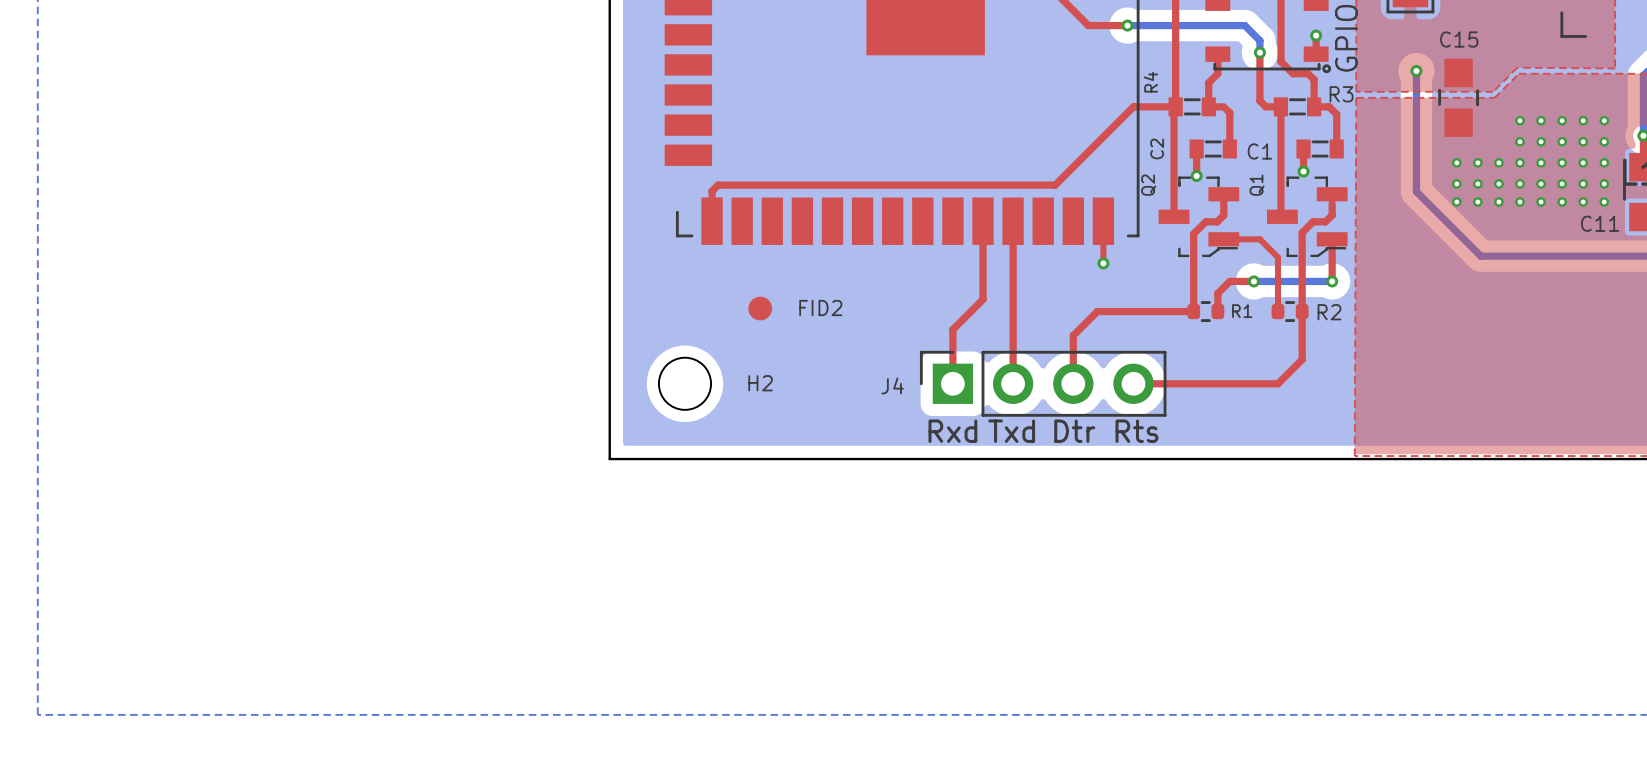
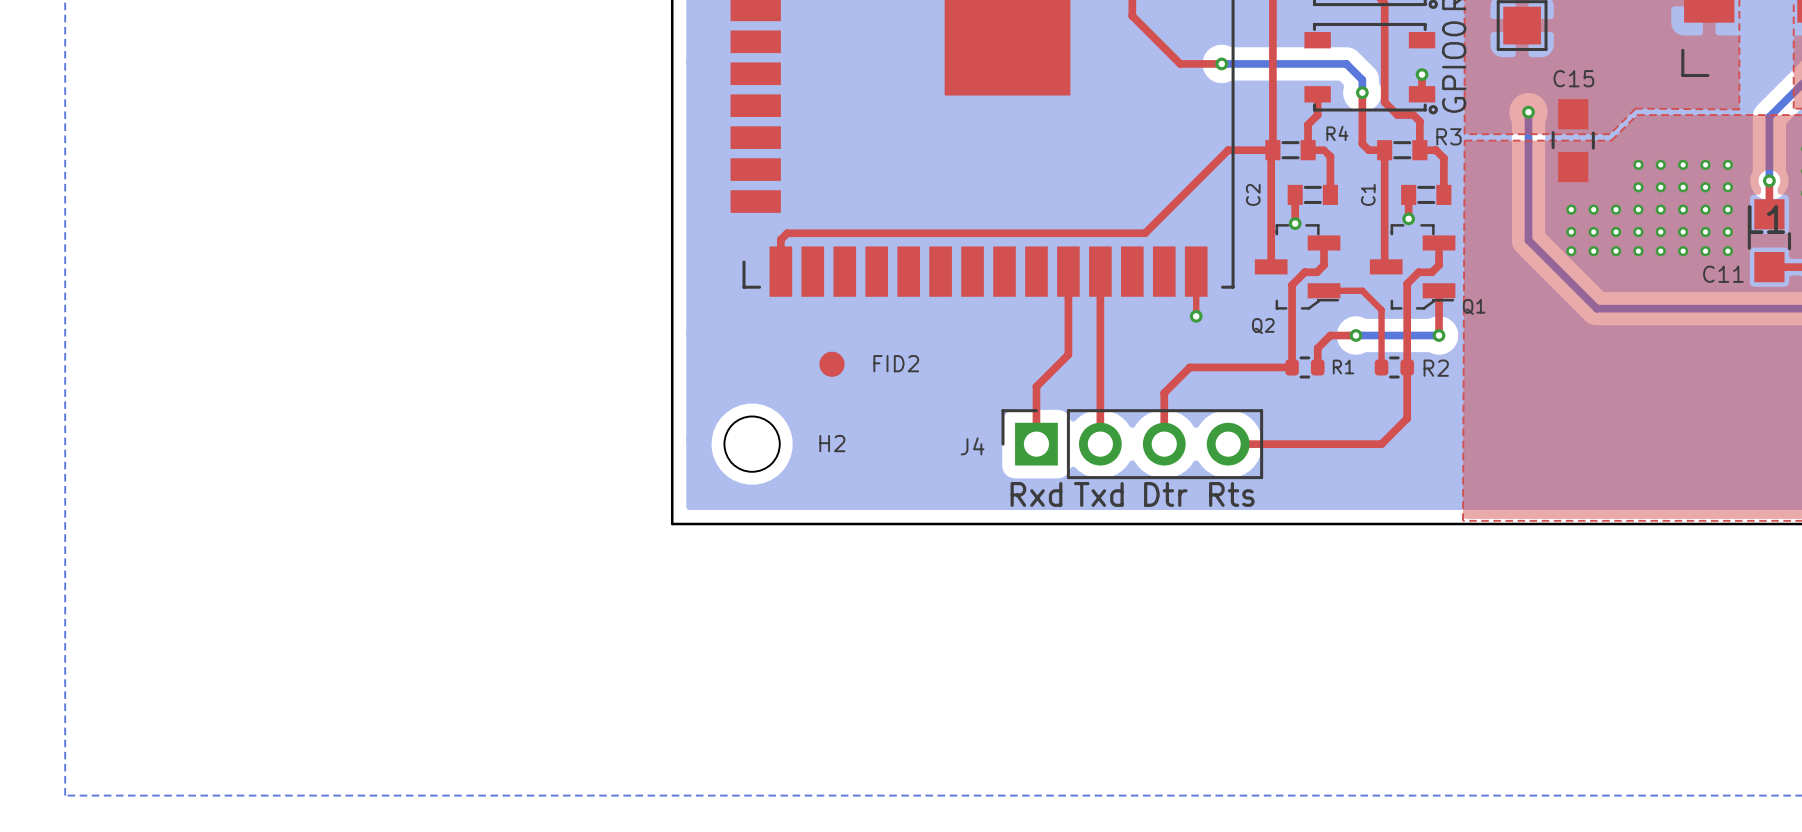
R4 name rotation: 0° (1150, 82) -> 90° clockwise (1337, 133)
R4 name position: R4 (1150, 82) -> R4 (1337, 133)
C1 name rotation: 0° (1259, 151) -> 90° counterclockwise (1368, 194)
Q2 name rotation: 0° (1148, 185) -> 90° clockwise (1263, 326)
Q2 name position: Q2 (1148, 185) -> Q2 (1263, 326)
Q1 name rotation: 0° (1257, 185) -> 90° clockwise (1474, 306)
Q1 name position: Q1 (1257, 185) -> Q1 (1474, 306)

